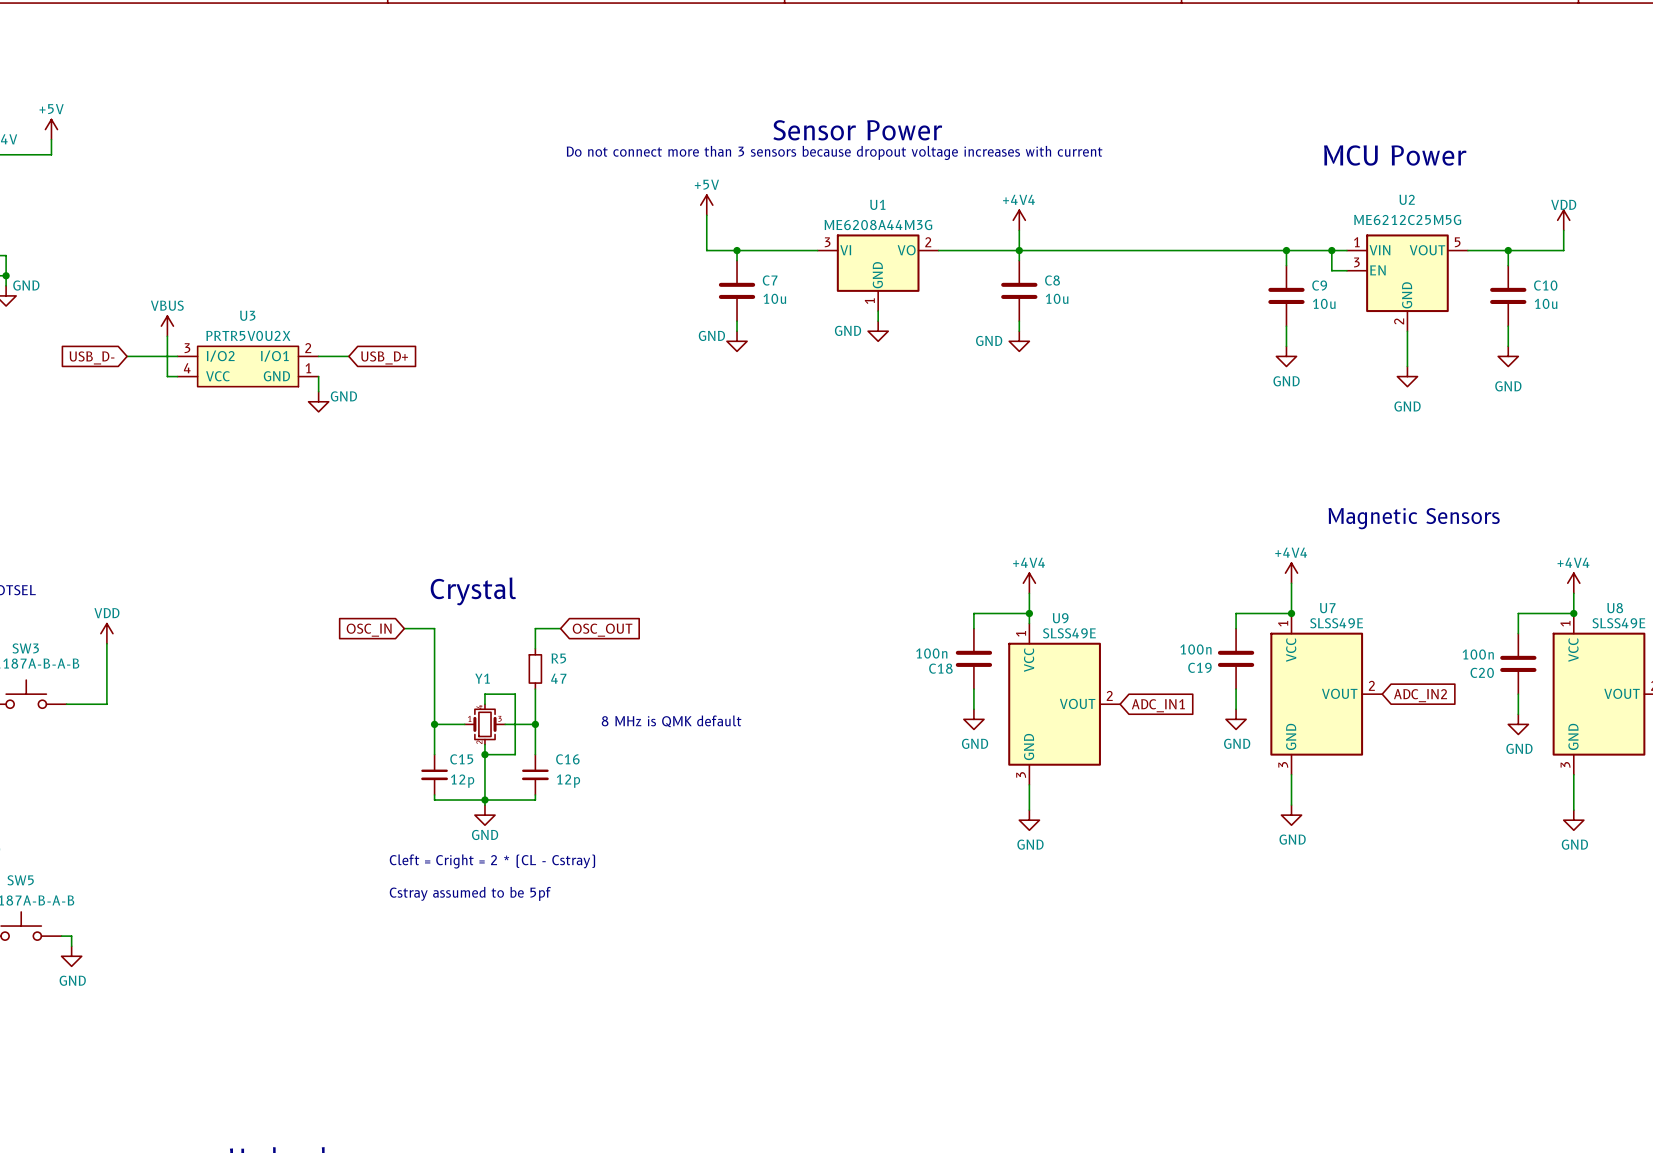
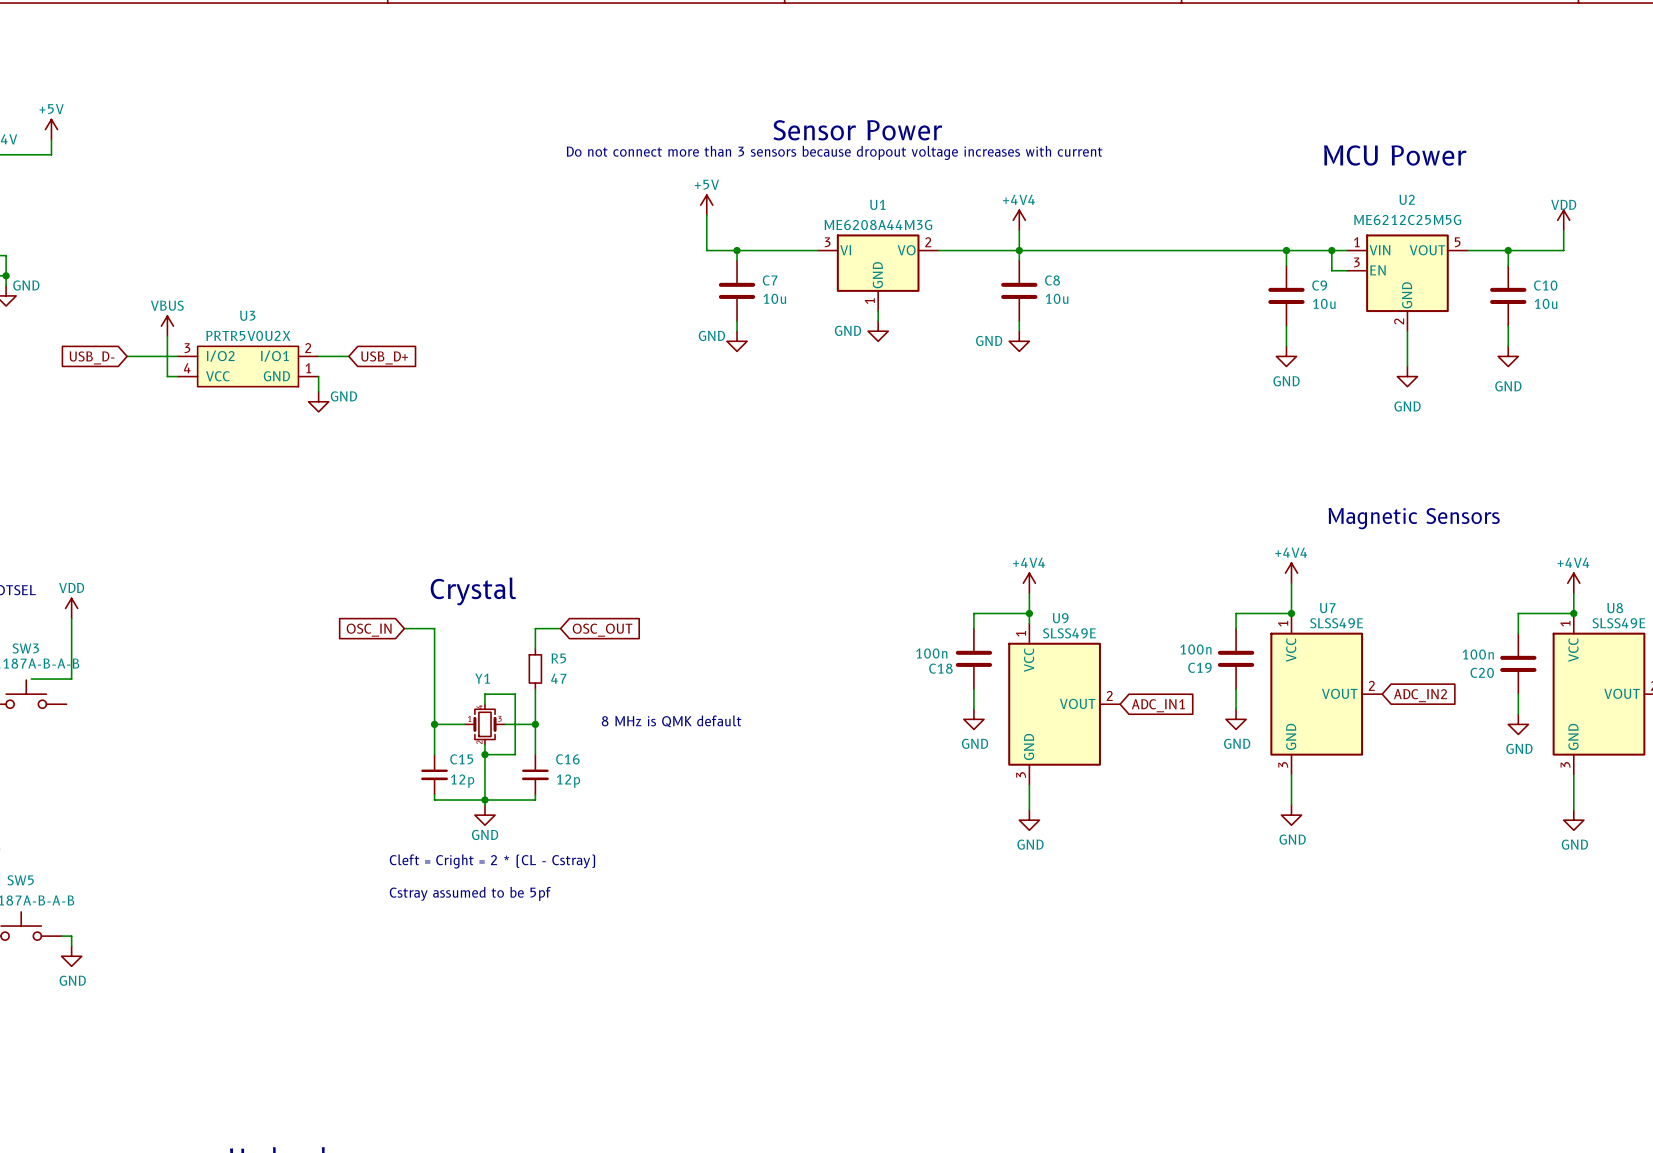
power symbol position: VDD (106, 633) -> VDD (71, 608)
wire: (106, 643) (106, 704) (66, 704) -> (71, 618) (71, 679) (31, 679)

